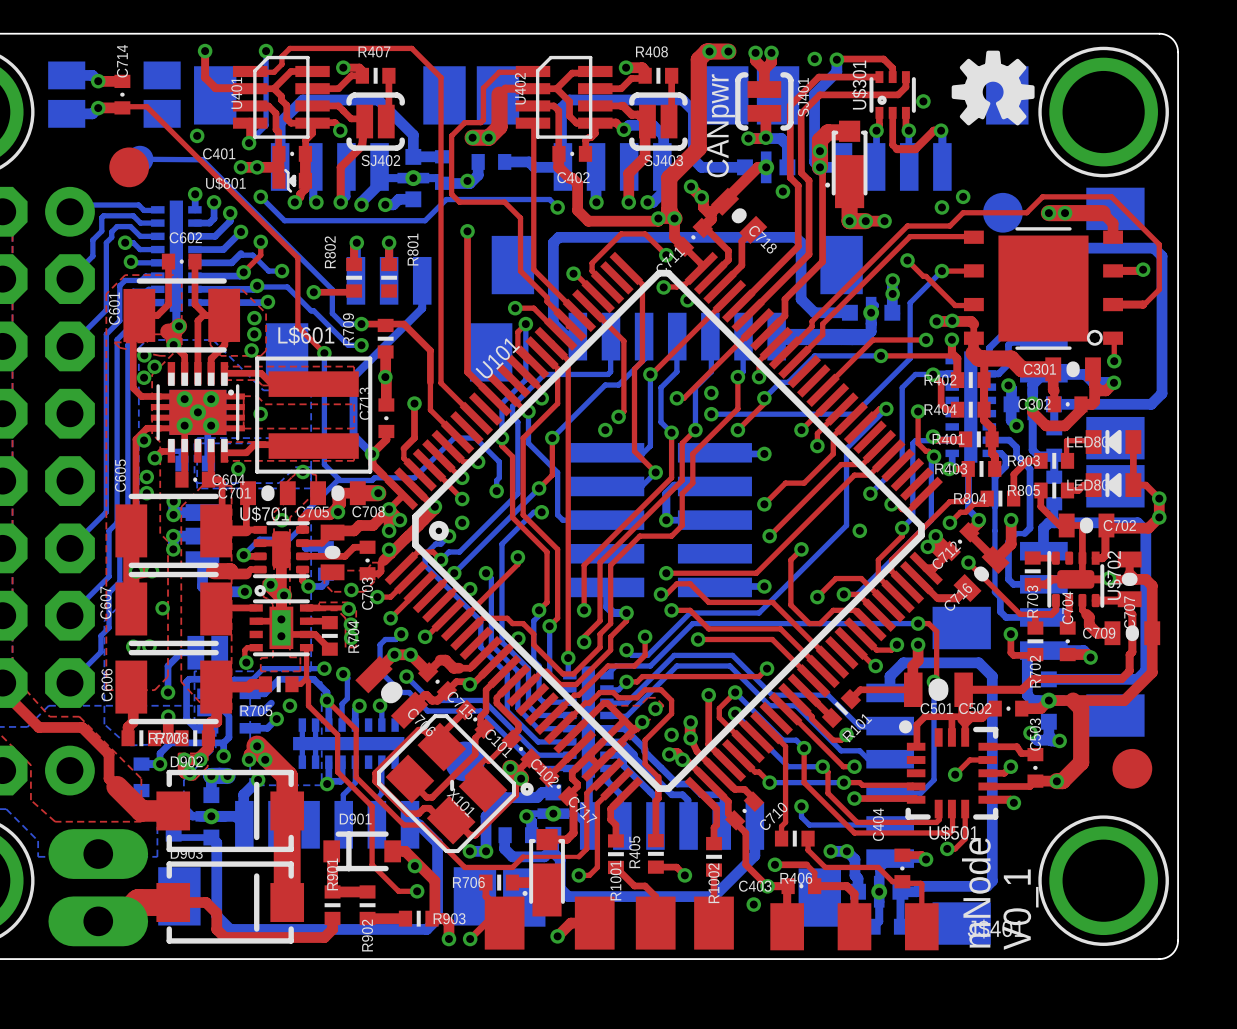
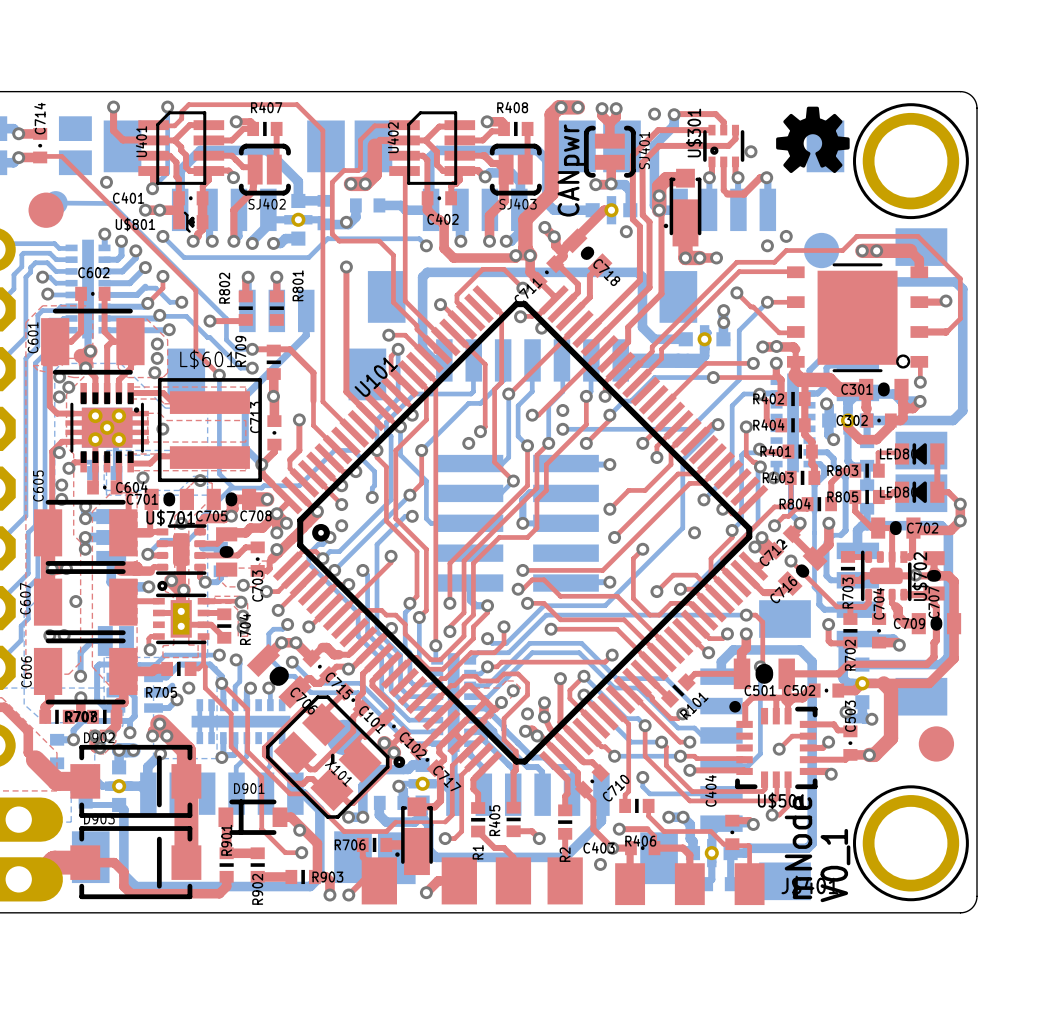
R1001 name: R1001 (615, 880) -> R1 (478, 852)
R1002 name: R1002 (713, 883) -> R2 (565, 854)

